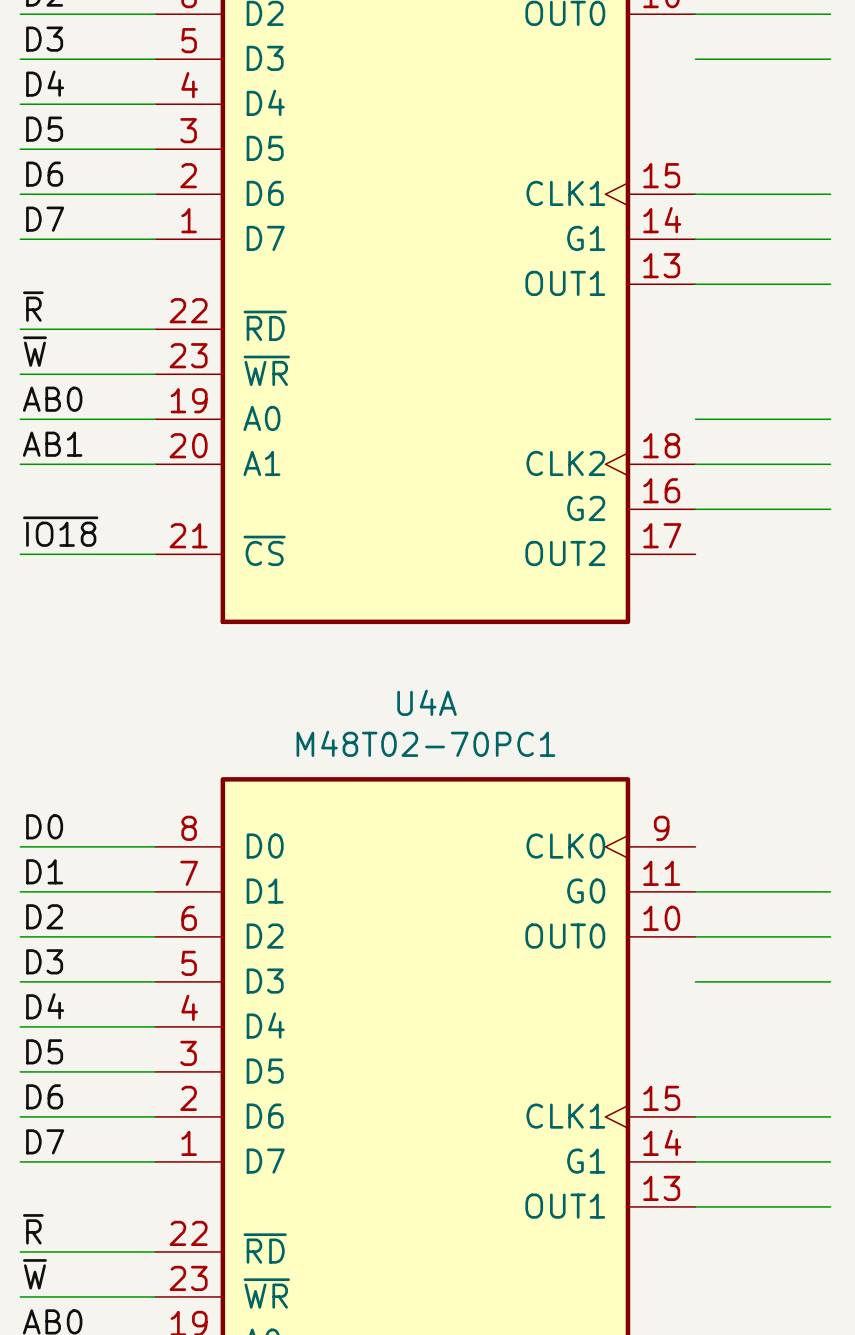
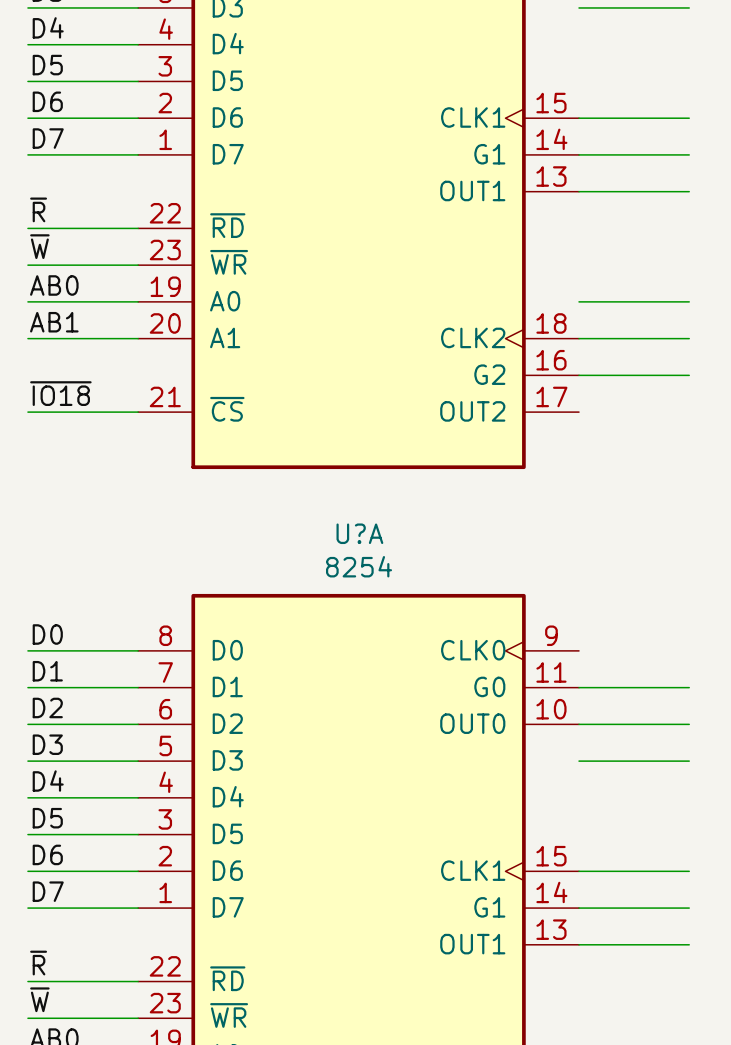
U4A name: U4A (427, 702) -> U?A (359, 533)
U4A value: M48T02-70PC1 (425, 743) -> 8254 (359, 566)

